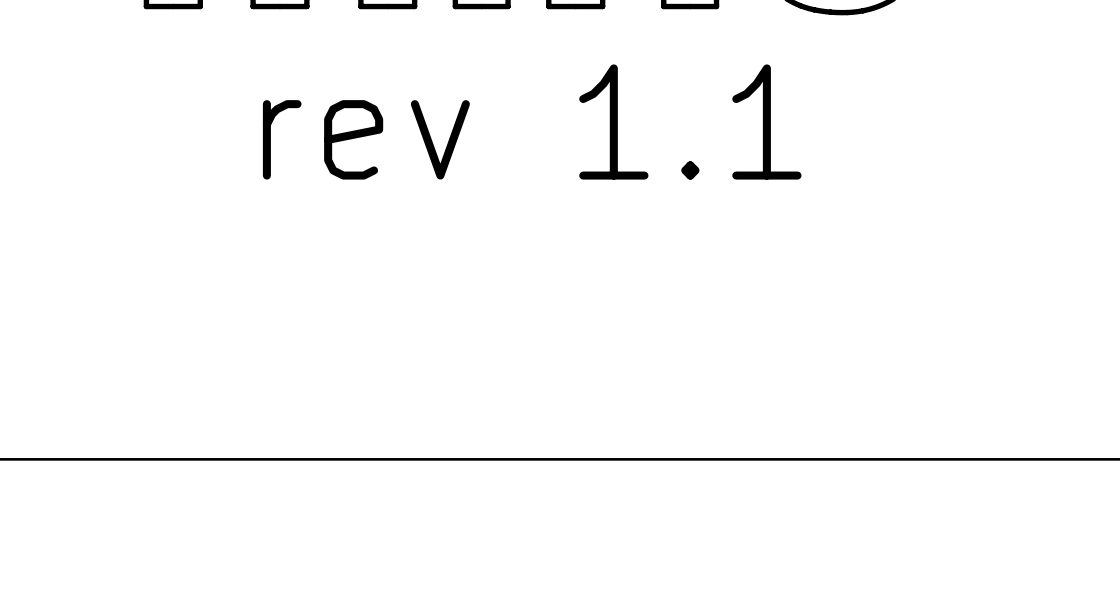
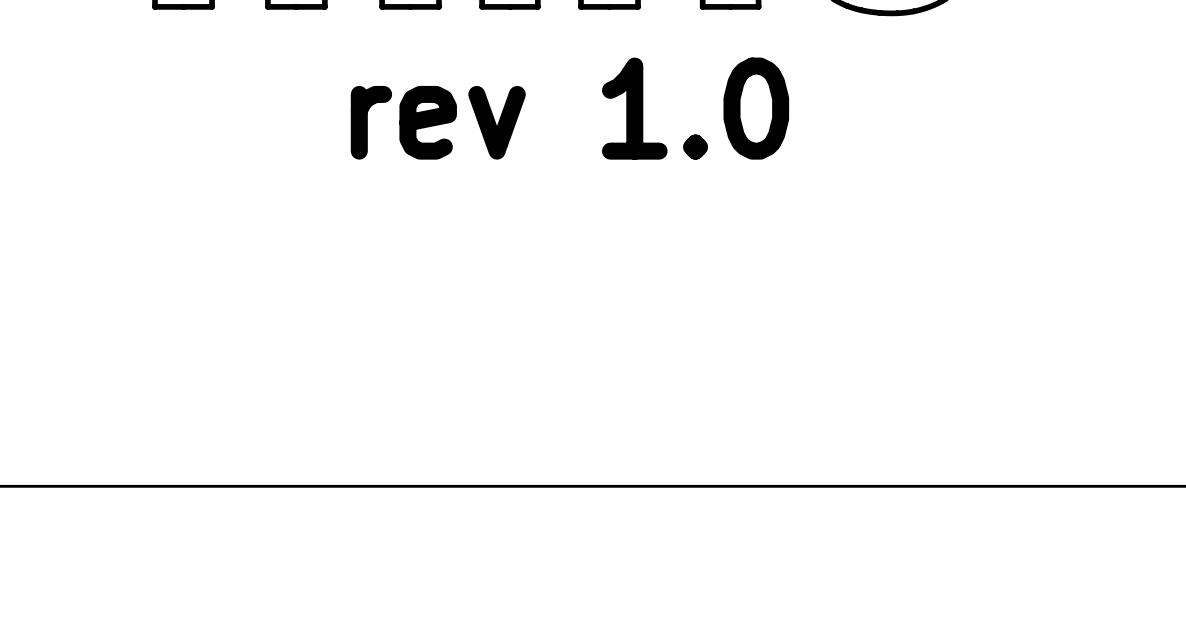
text: rev 1.1 (532, 121) -> rev 1.0 (569, 108)

